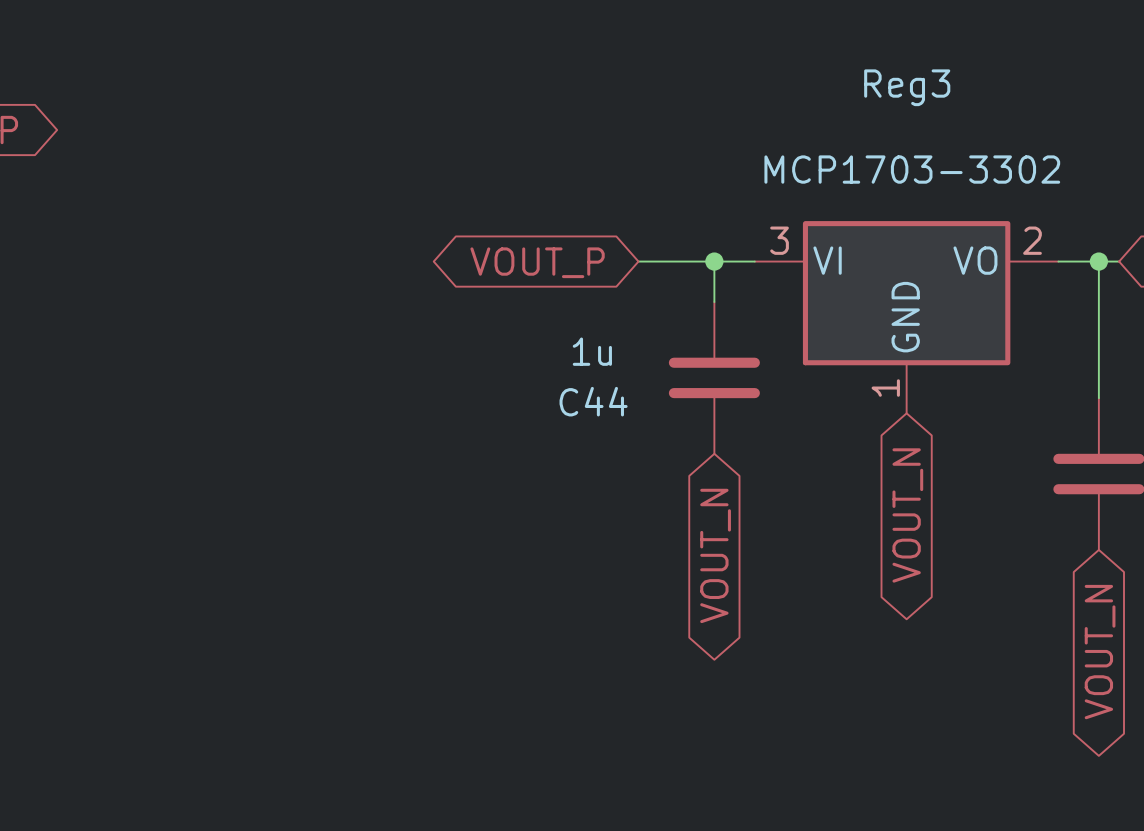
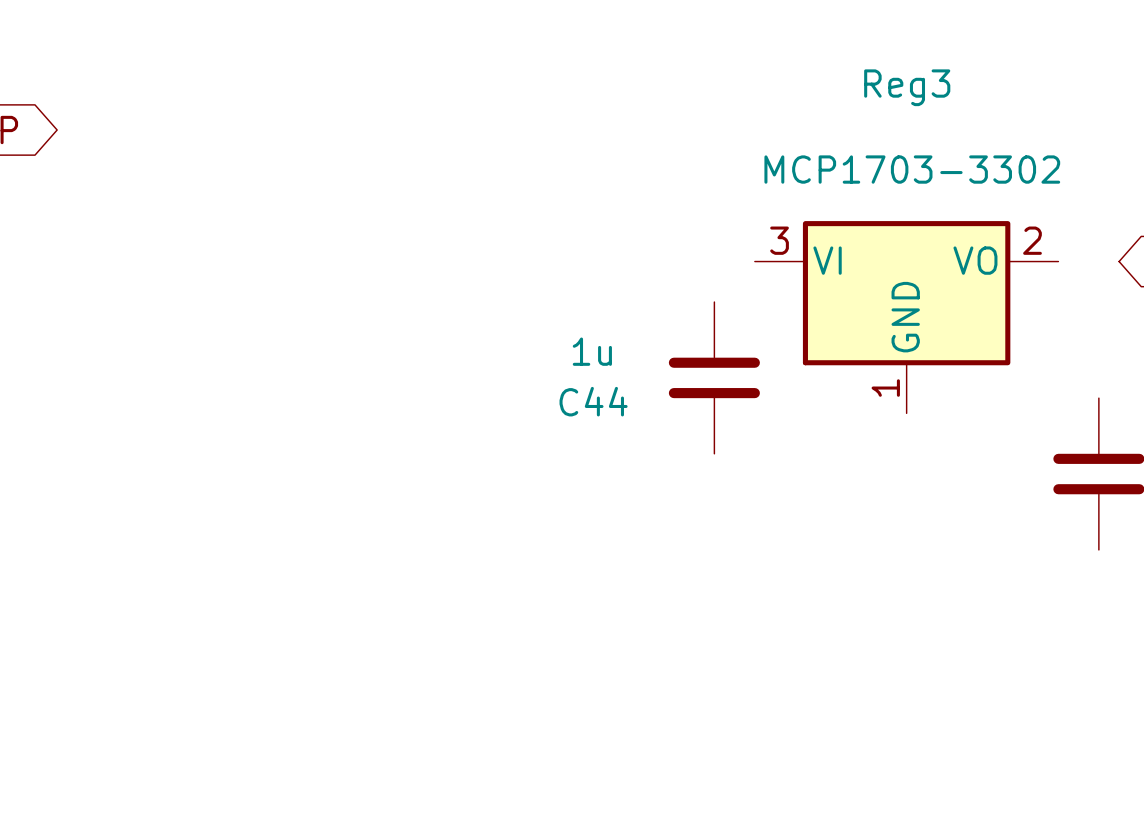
wire: (638, 261) (754, 261) -> none
wire: (714, 261) (714, 302) -> none
junction: (714, 261) -> none
wire: (1058, 261) (1119, 261) -> none
wire: (1098, 261) (1098, 398) -> none
junction: (1098, 261) -> none
global label: VOUT_P (537, 262) -> none
global label: VOUT_N (907, 515) -> none
global label: VOUT_N (715, 555) -> none
global label: VOUT_N (1100, 652) -> none

